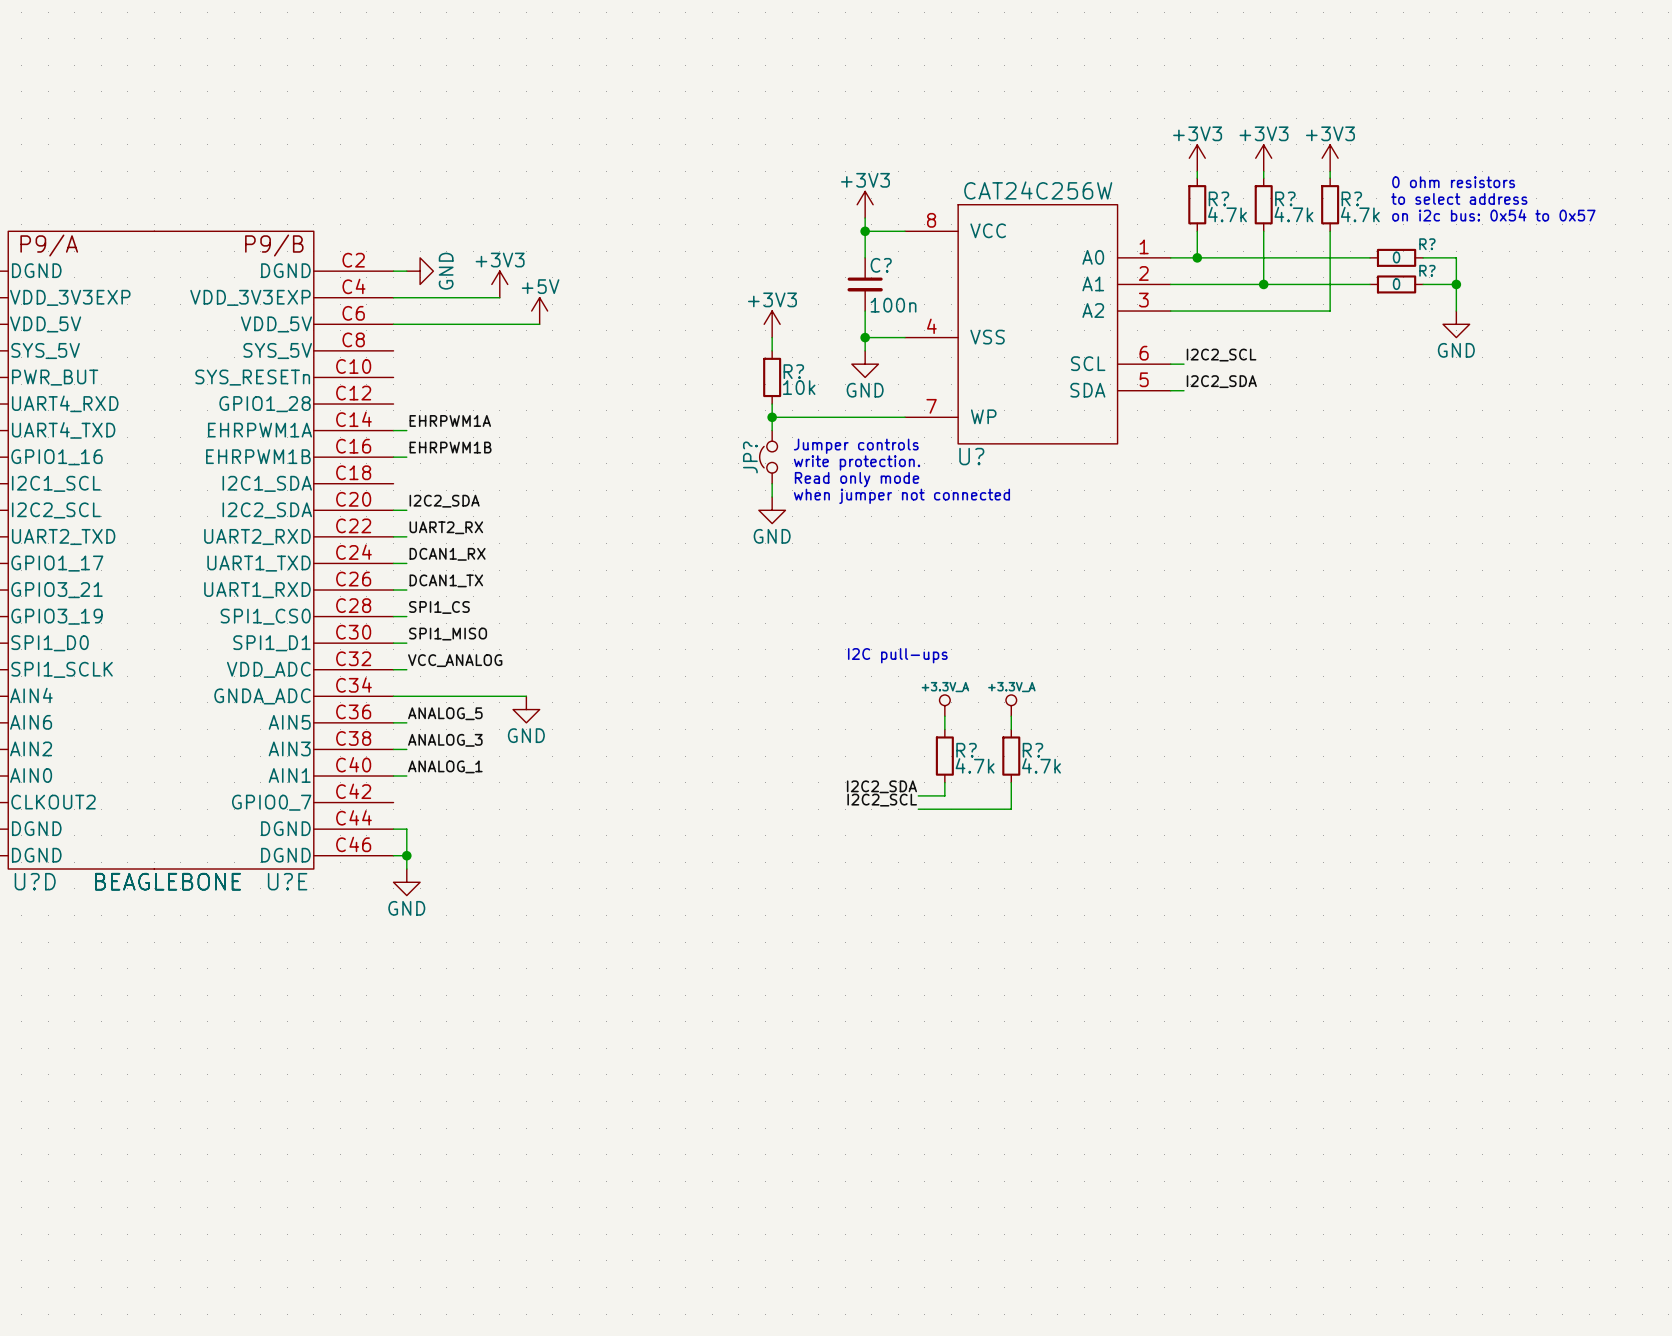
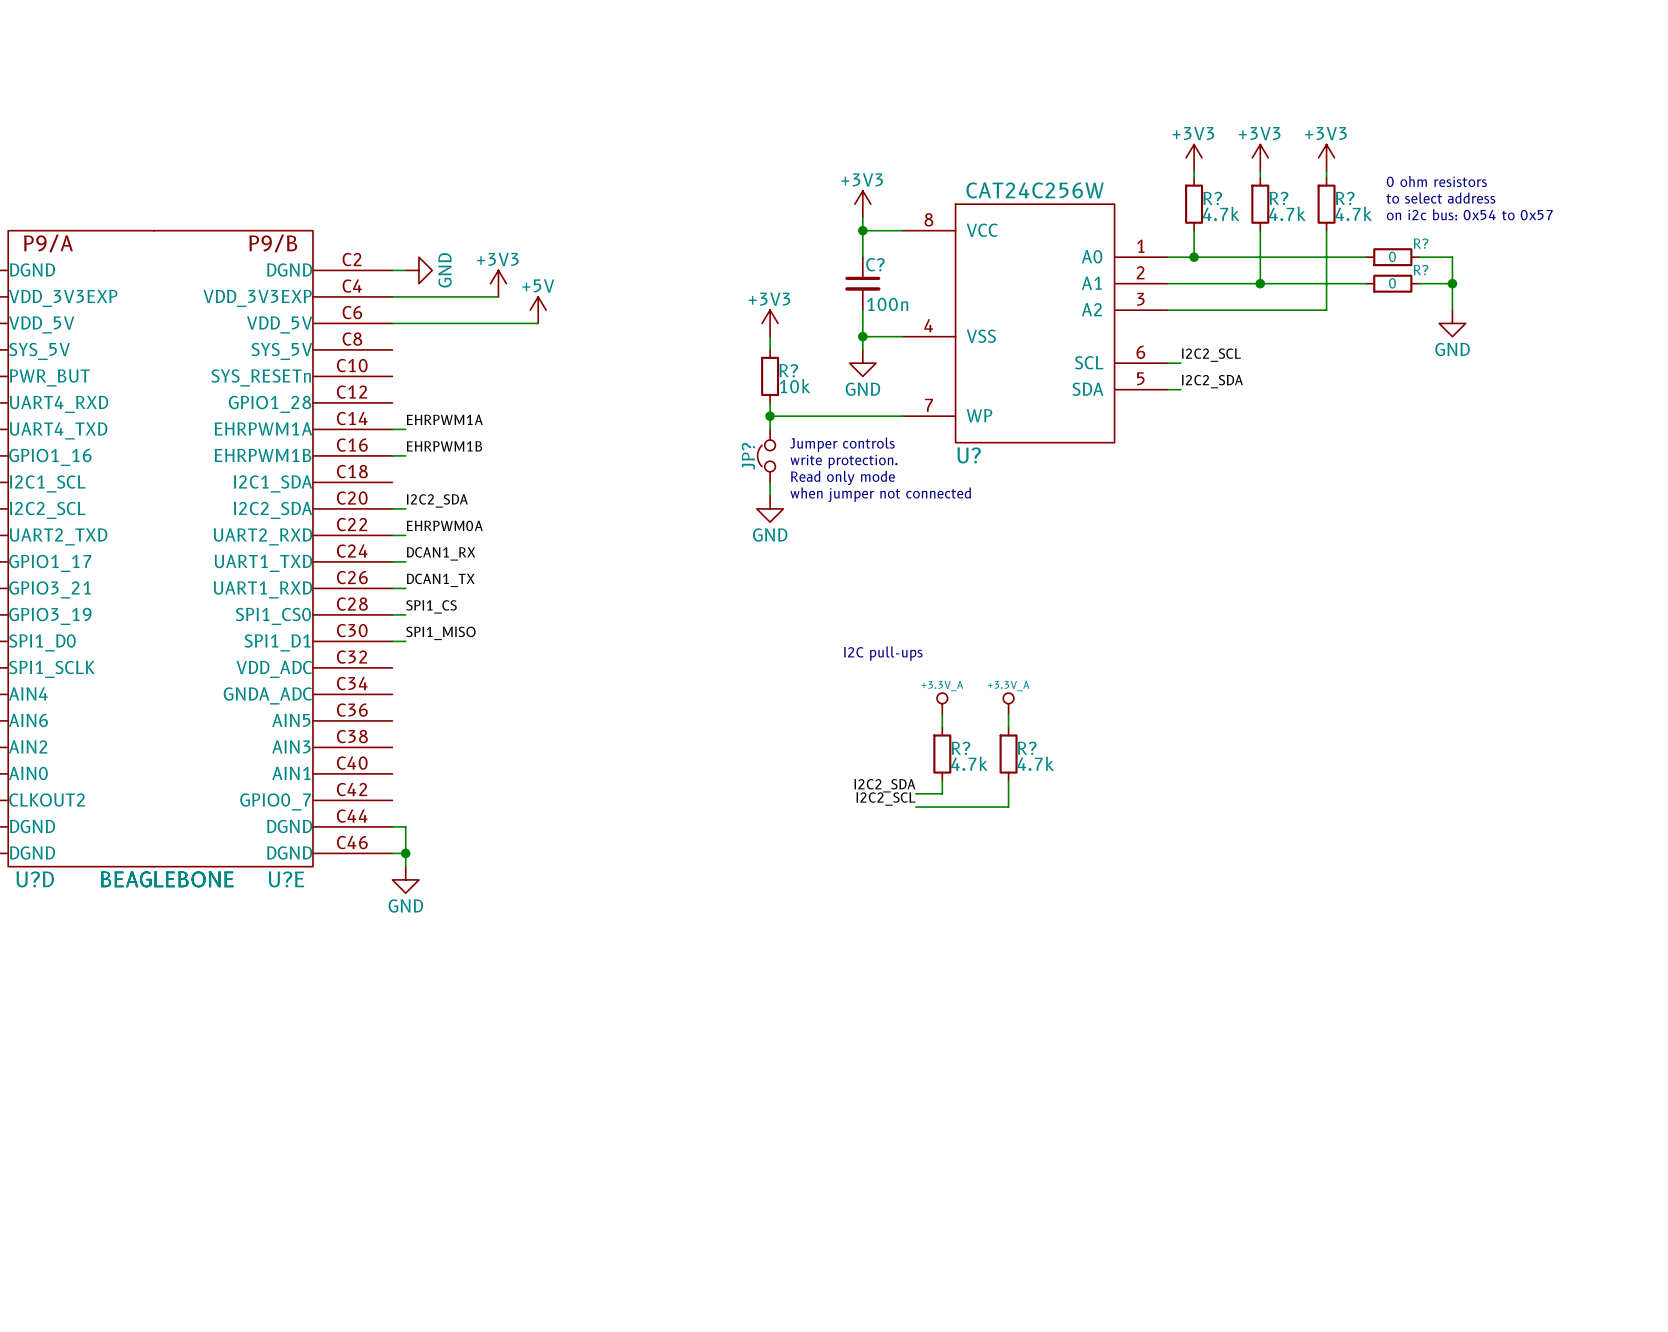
label: UART2_RX (446, 527) -> EHRPWM0A (444, 525)
label: VCC_ANALOG (455, 660) -> none
wire: (393, 669) (406, 669) -> none
wire: (393, 696) (526, 696) -> none
power symbol: GND (526, 709) -> none
label: ANALOG_5 (445, 713) -> none
wire: (393, 722) (406, 722) -> none
label: ANALOG_3 (445, 740) -> none
wire: (393, 749) (406, 749) -> none
label: ANALOG_1 (445, 766) -> none
wire: (393, 776) (406, 776) -> none

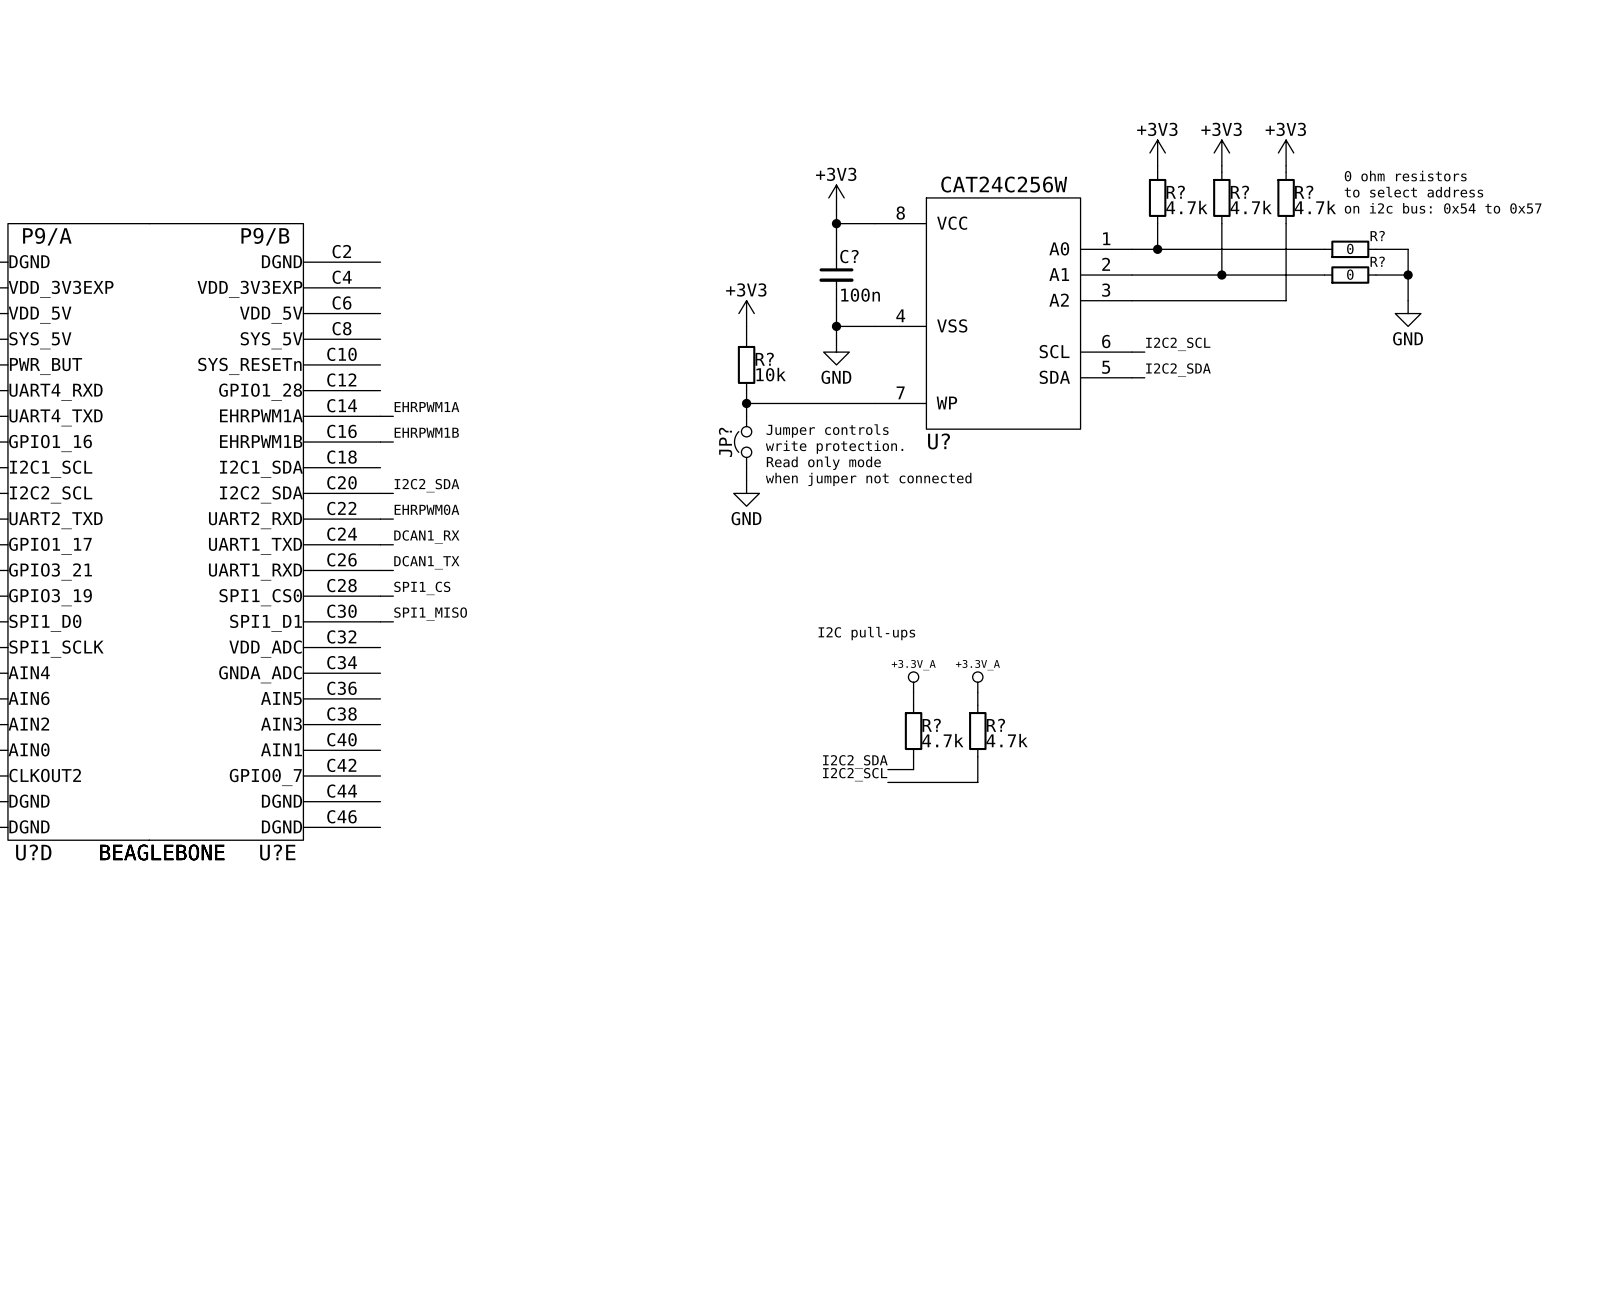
wire: (392, 270) (405, 270) -> none
power symbol: GND (418, 270) -> none
power symbol: +3V3 (498, 283) -> none
wire: (392, 296) (498, 296) -> none
power symbol: +5V (538, 310) -> none
wire: (392, 323) (538, 323) -> none
wire: (392, 826) (405, 826) (405, 866) -> none
wire: (392, 853) (405, 853) -> none
junction: (405, 853) -> none
power symbol: GND (405, 879) -> none

